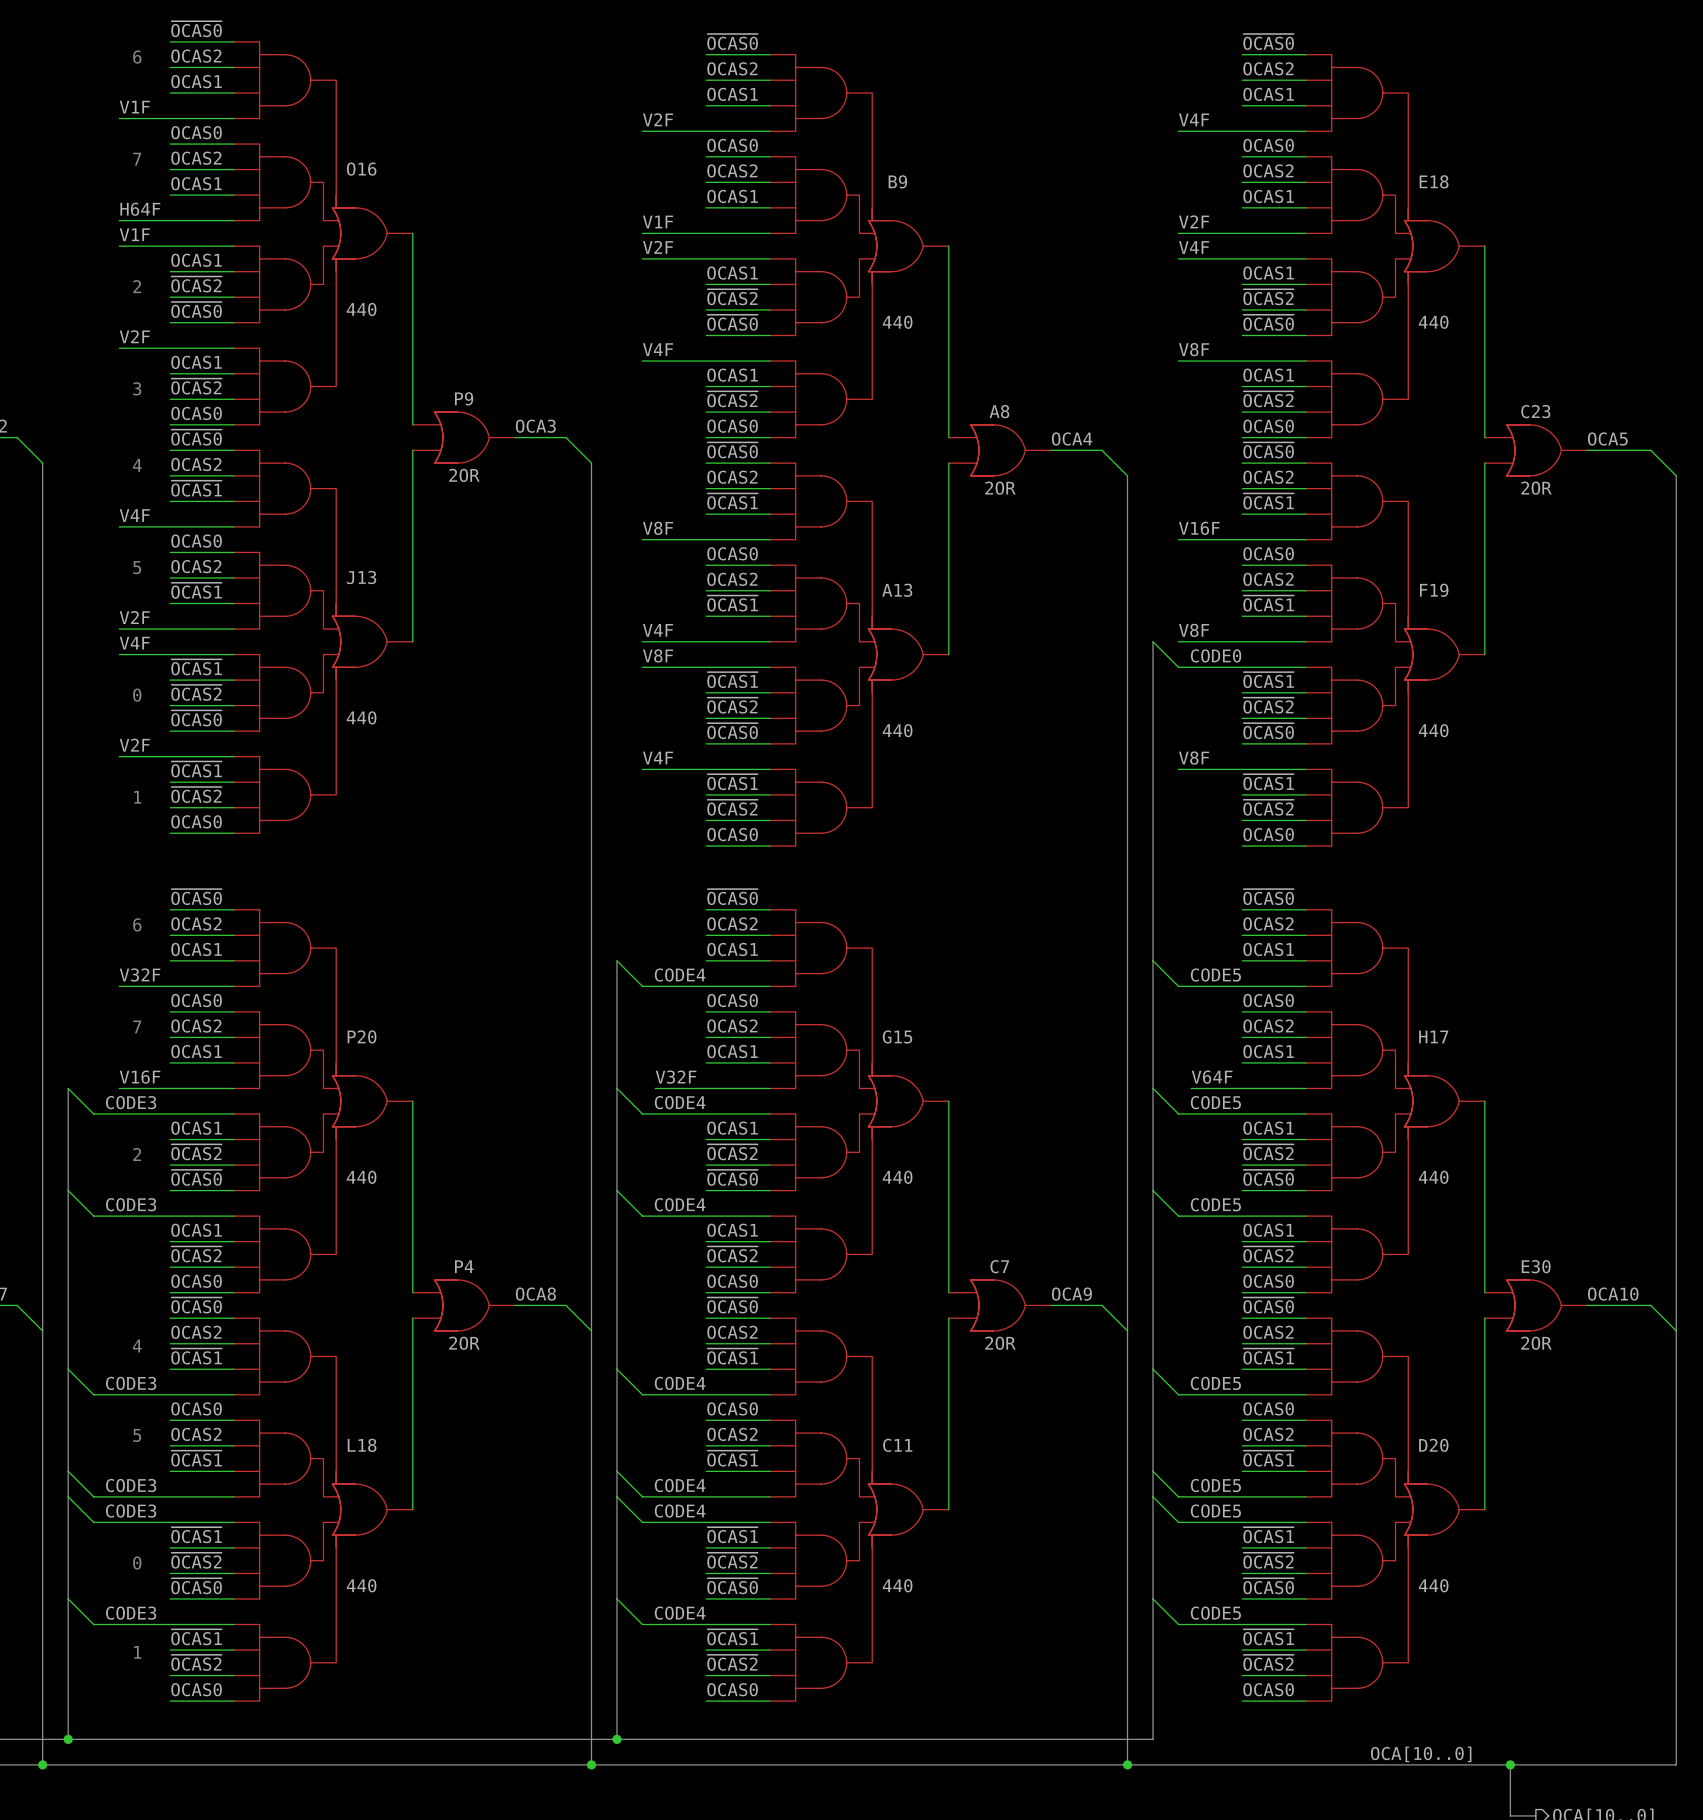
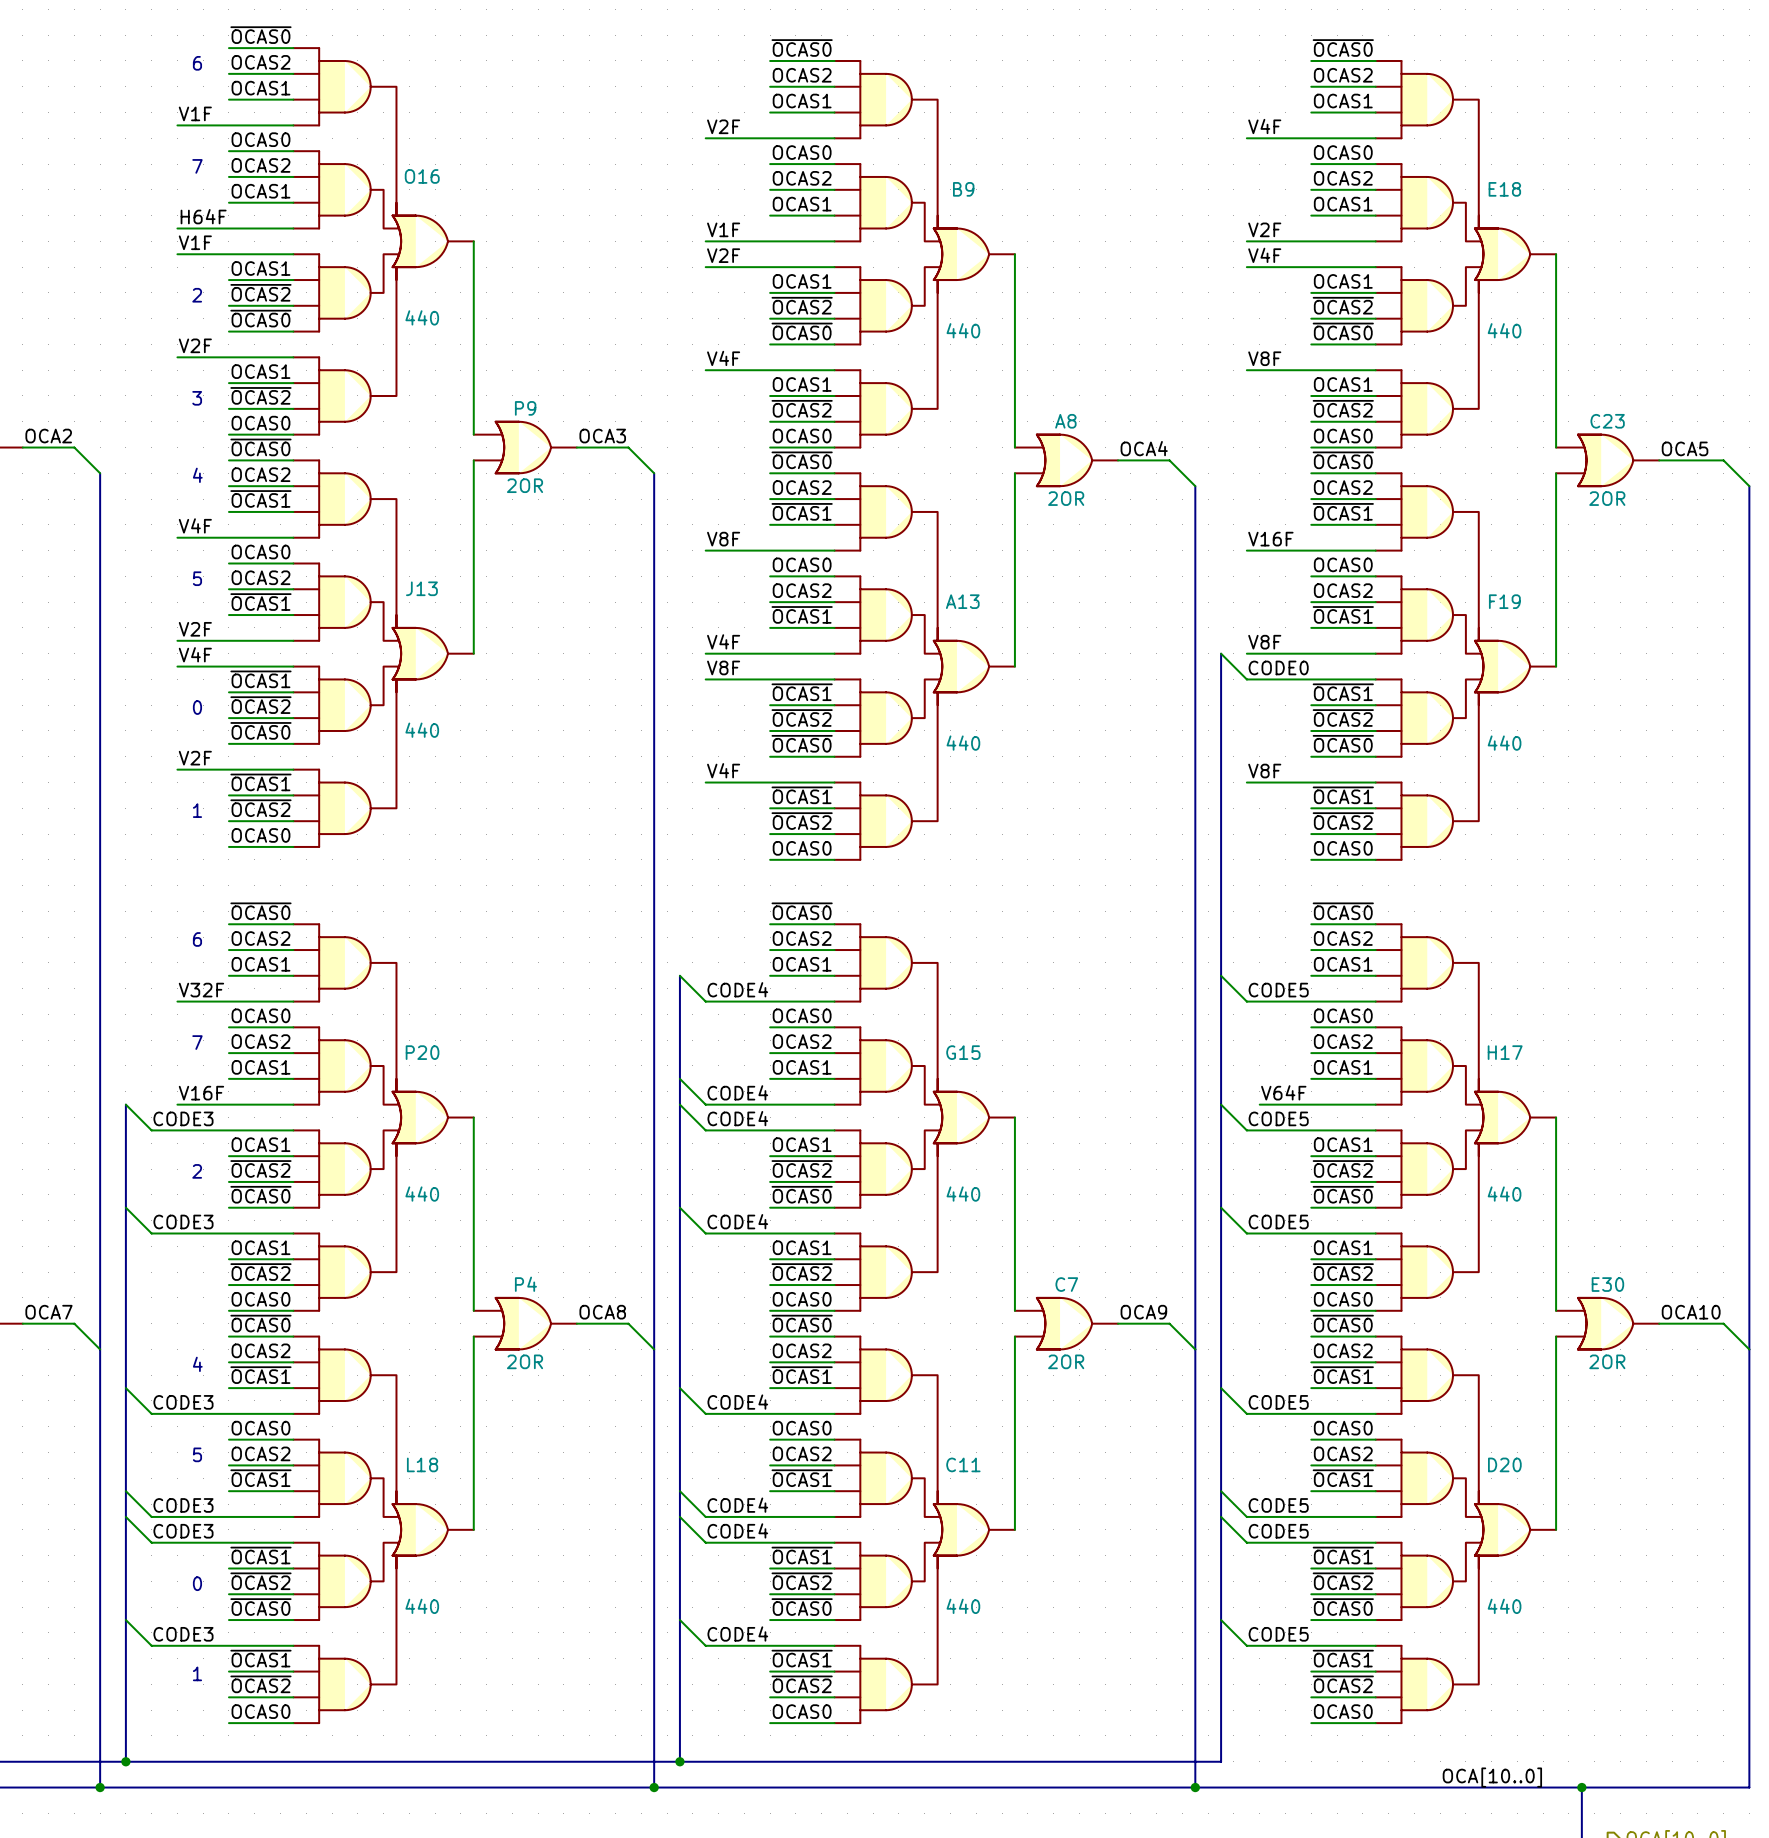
wire: none -> (679, 1078) (705, 1104) (718, 1104)
label: V32F (676, 1077) -> none
label: none -> CODE4 (737, 1092)

